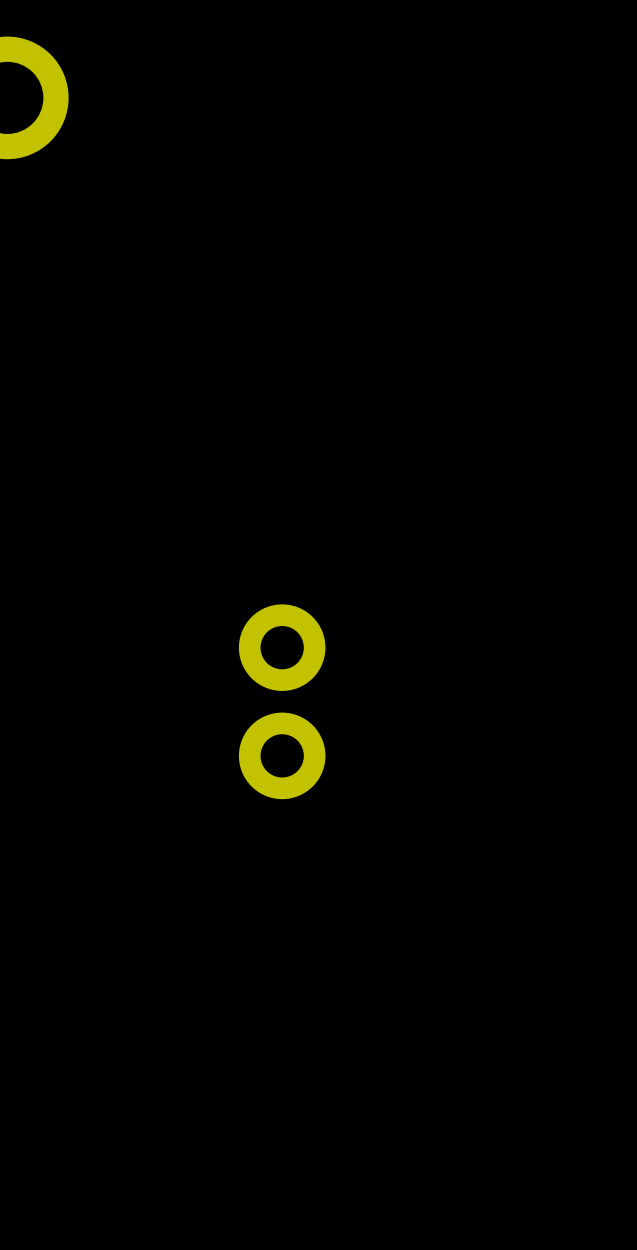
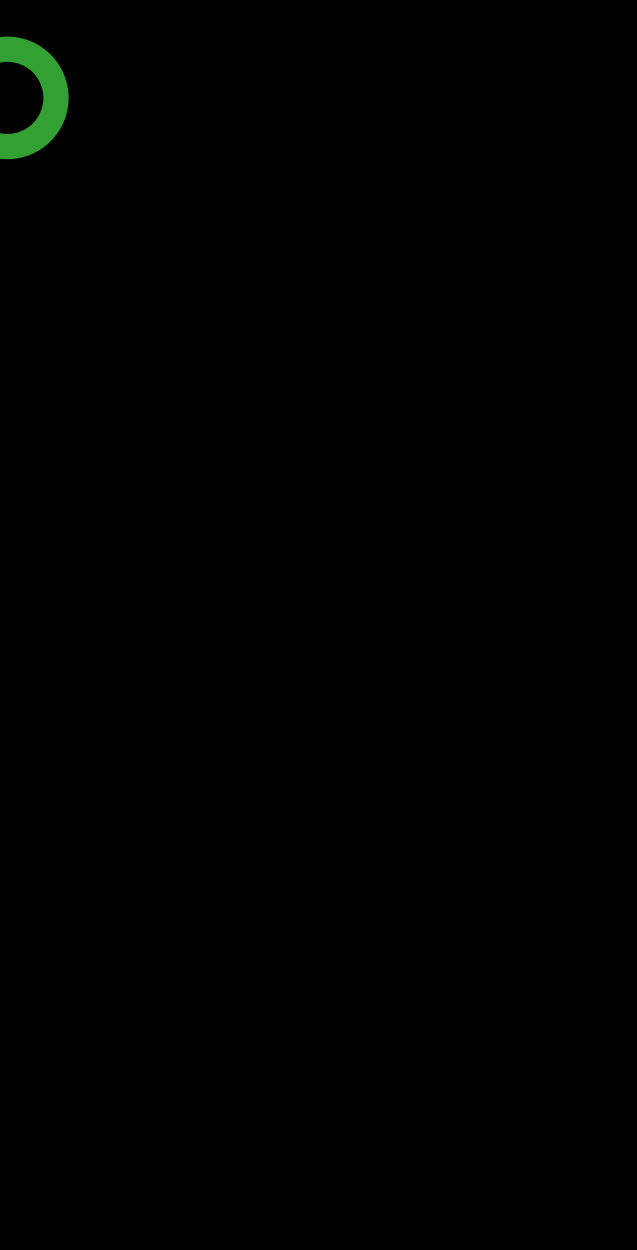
part: (282, 701) -> none

